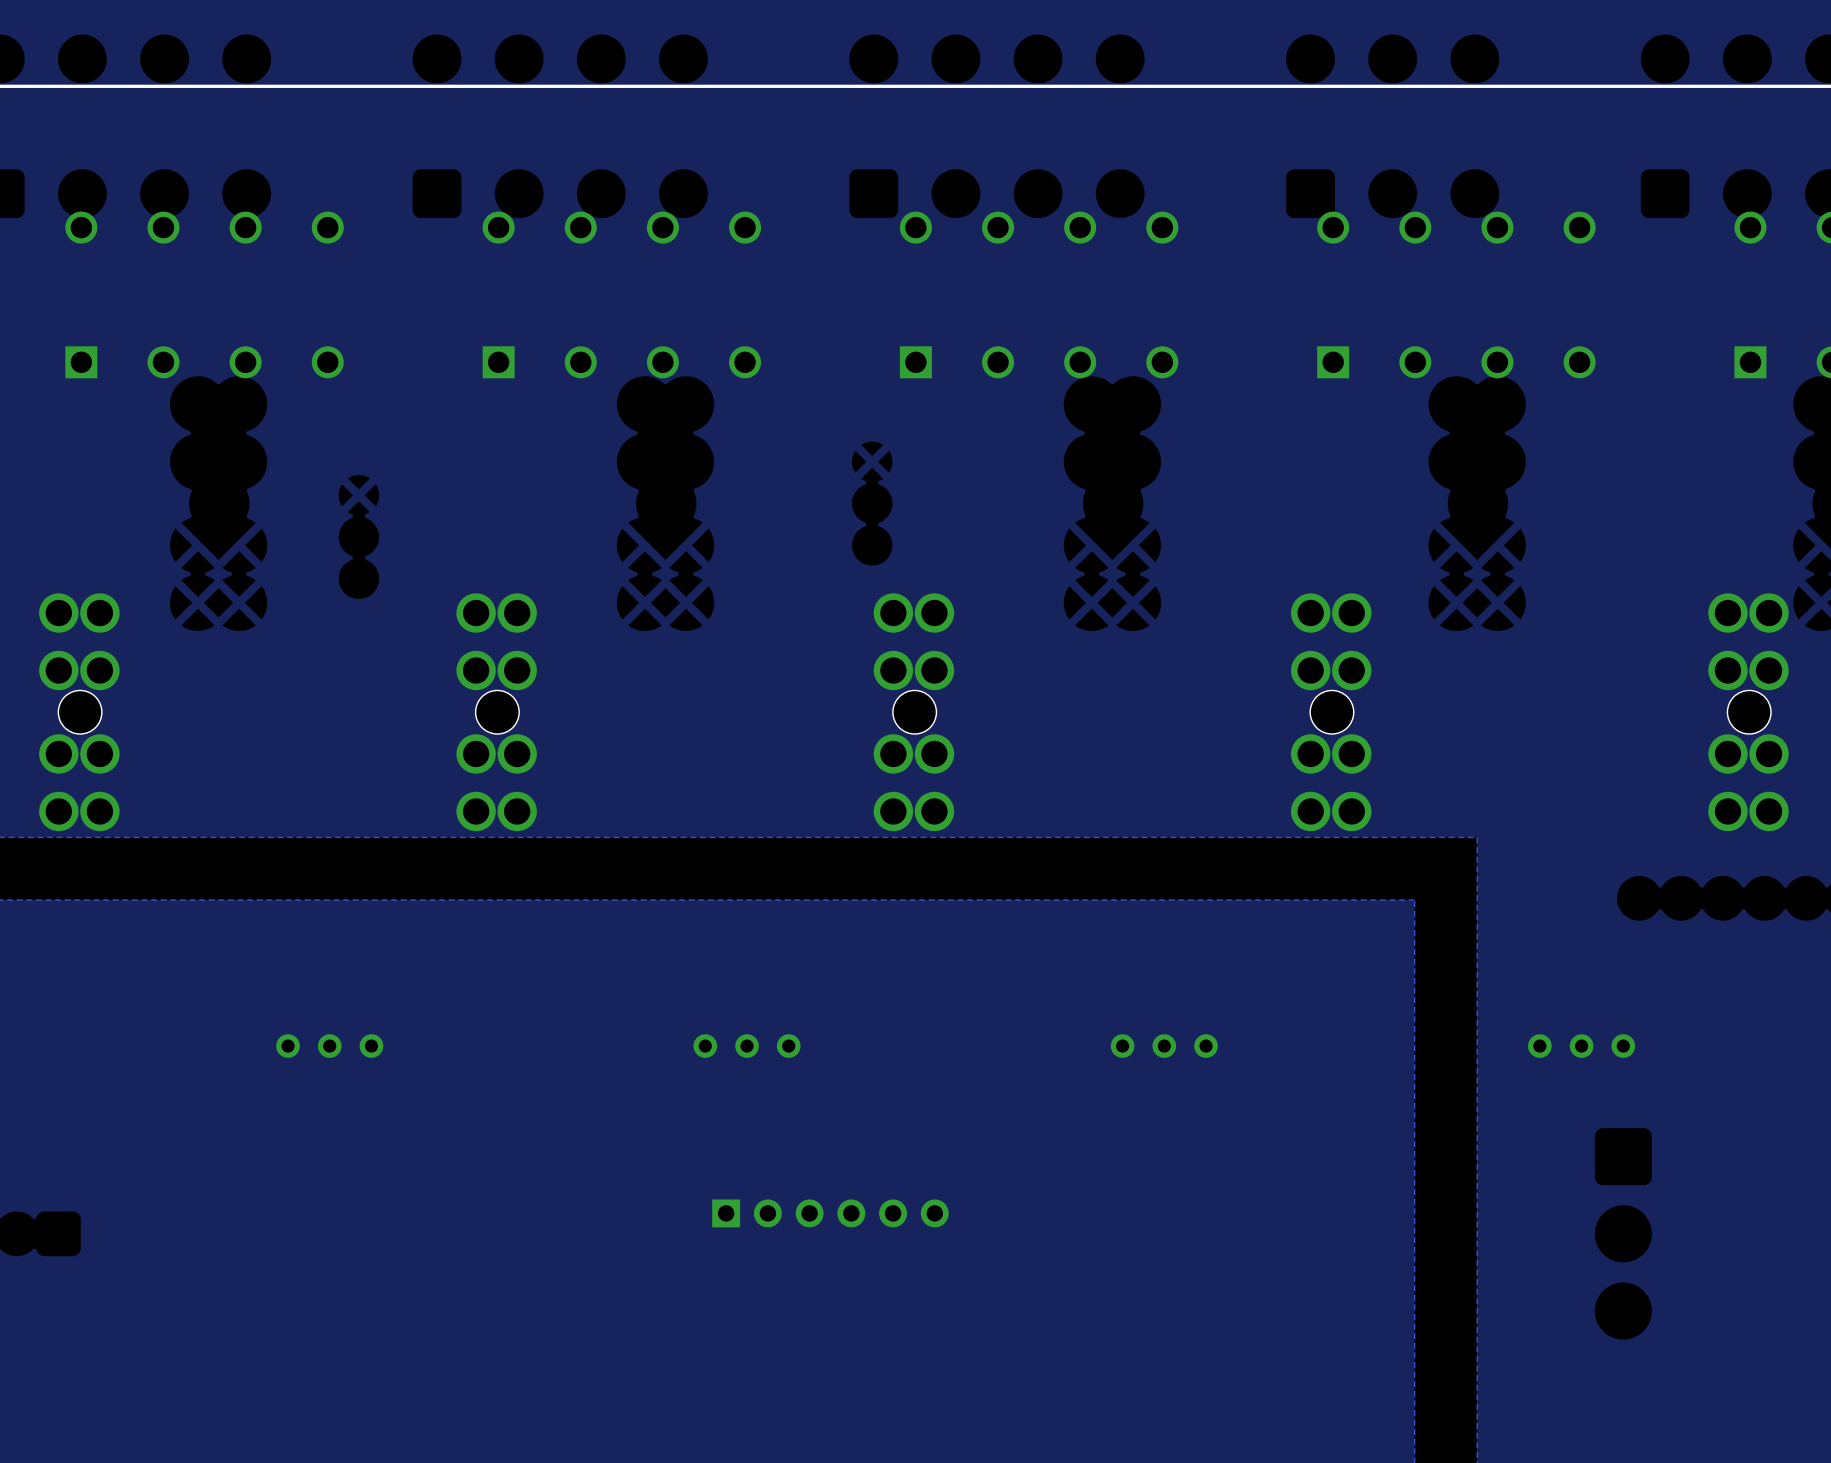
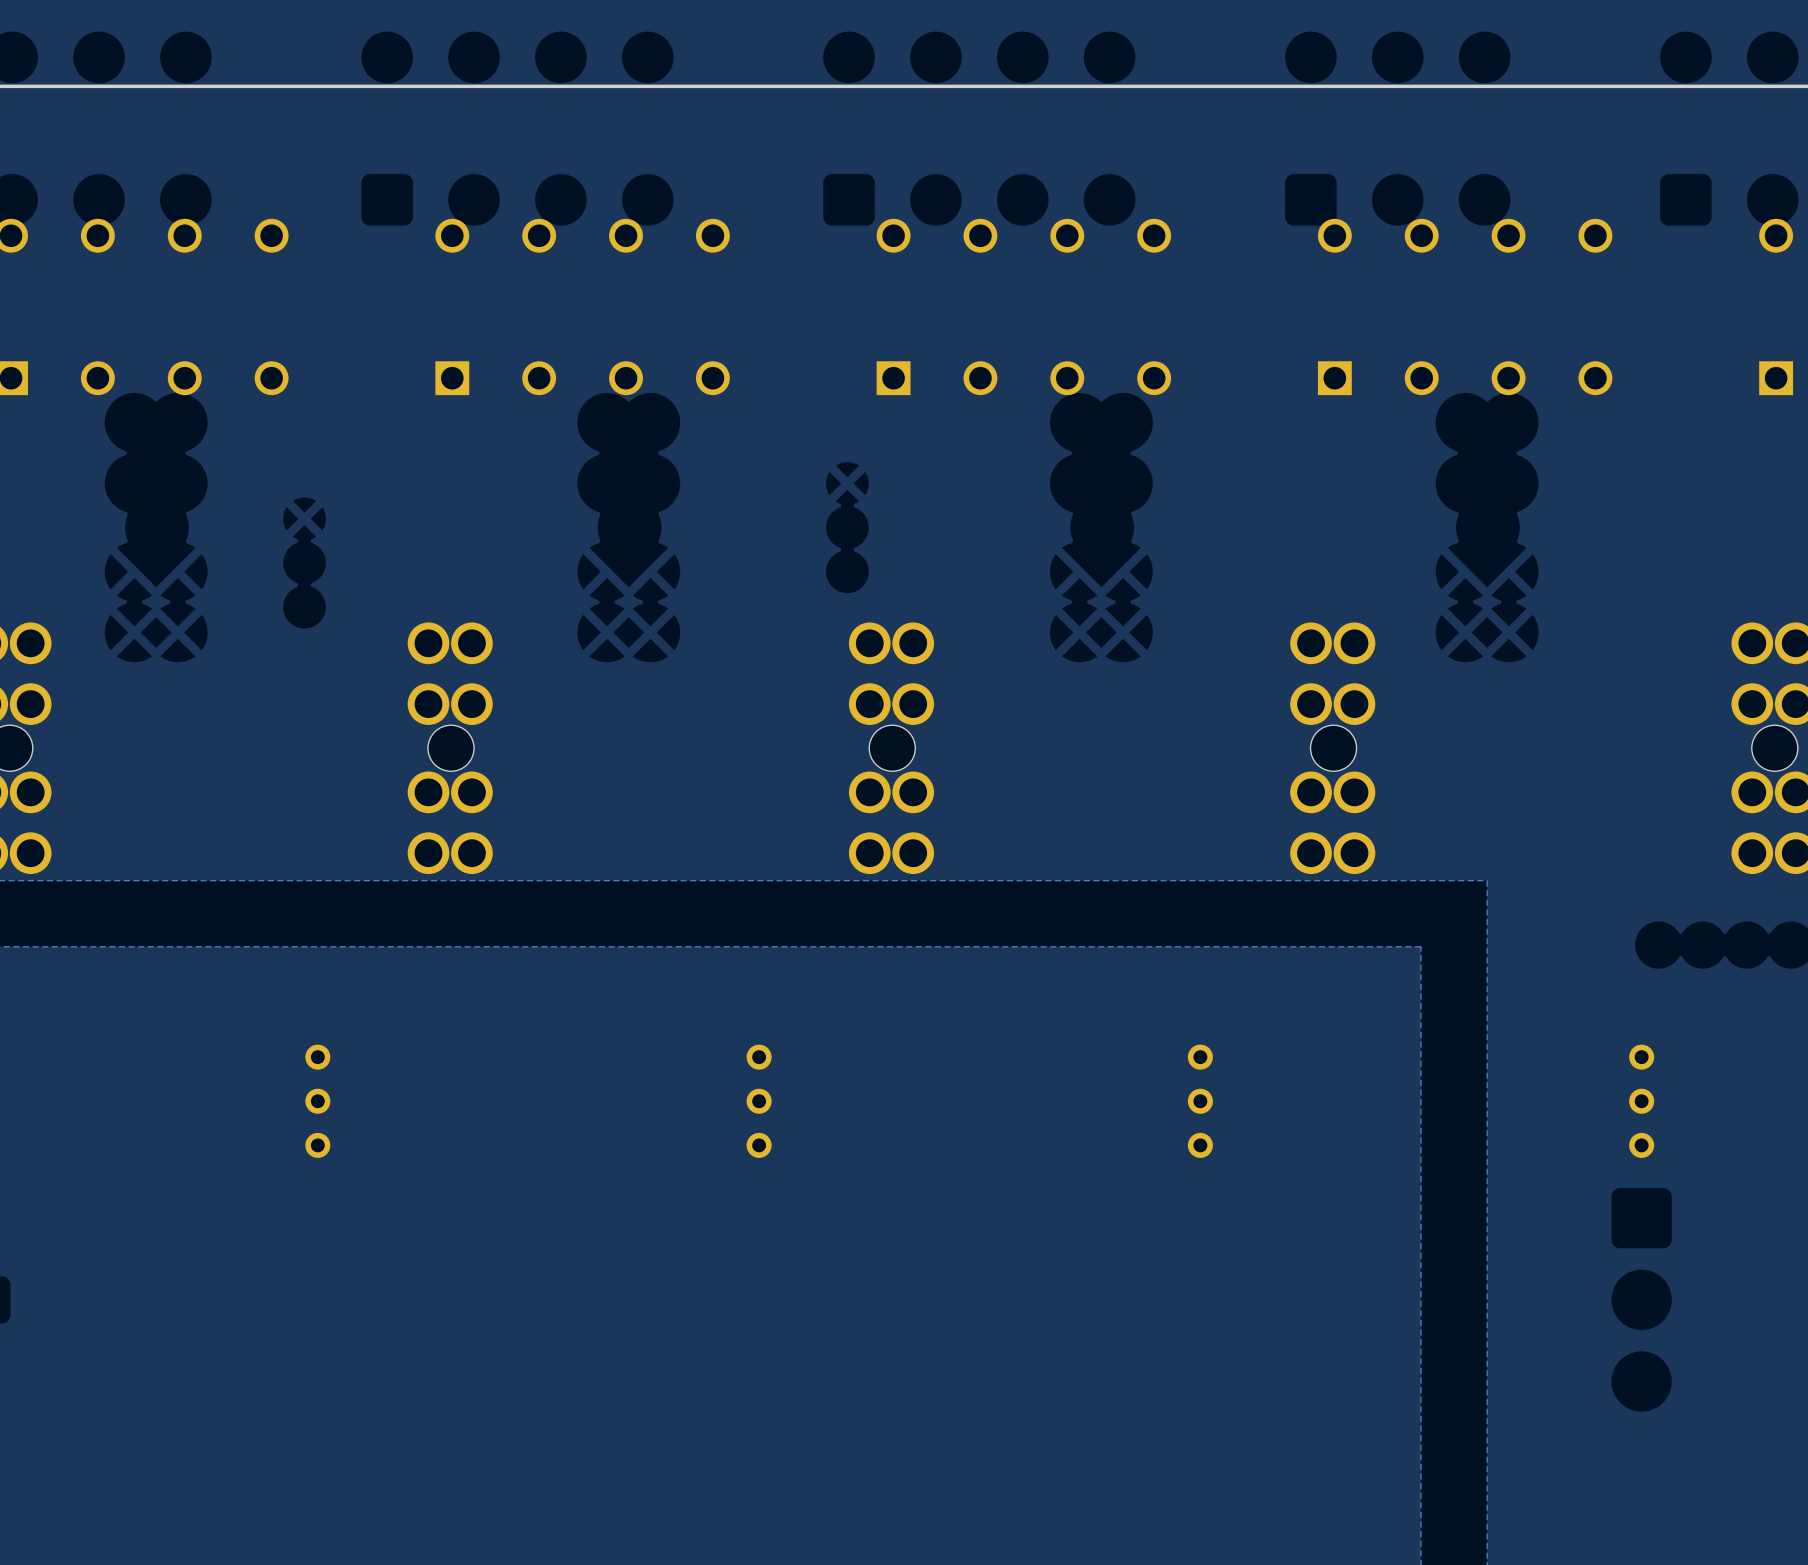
part rotation: 0° (329, 1046) -> 90° clockwise (317, 1101)
part rotation: 0° (747, 1046) -> 90° clockwise (759, 1101)
part rotation: 0° (1164, 1046) -> 90° clockwise (1200, 1101)
part rotation: 0° (1581, 1046) -> 90° clockwise (1641, 1101)
part: (830, 1213) -> none

